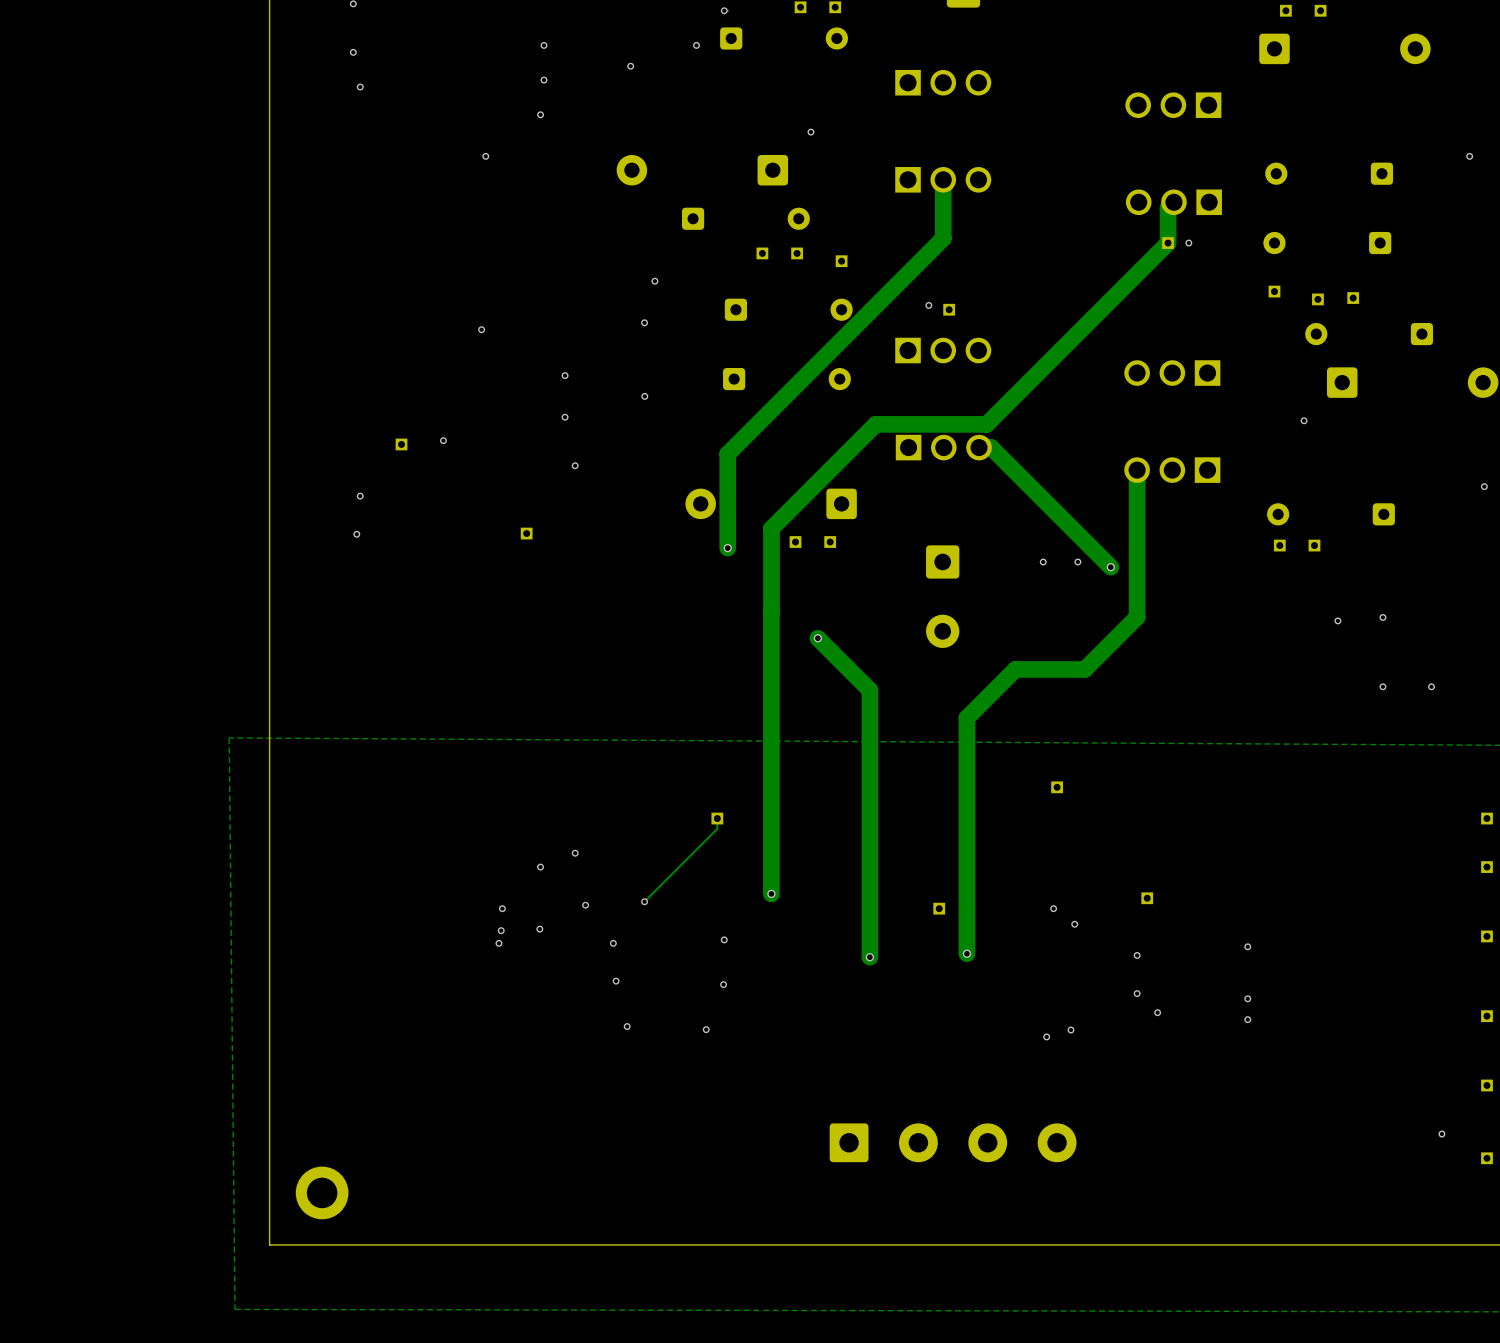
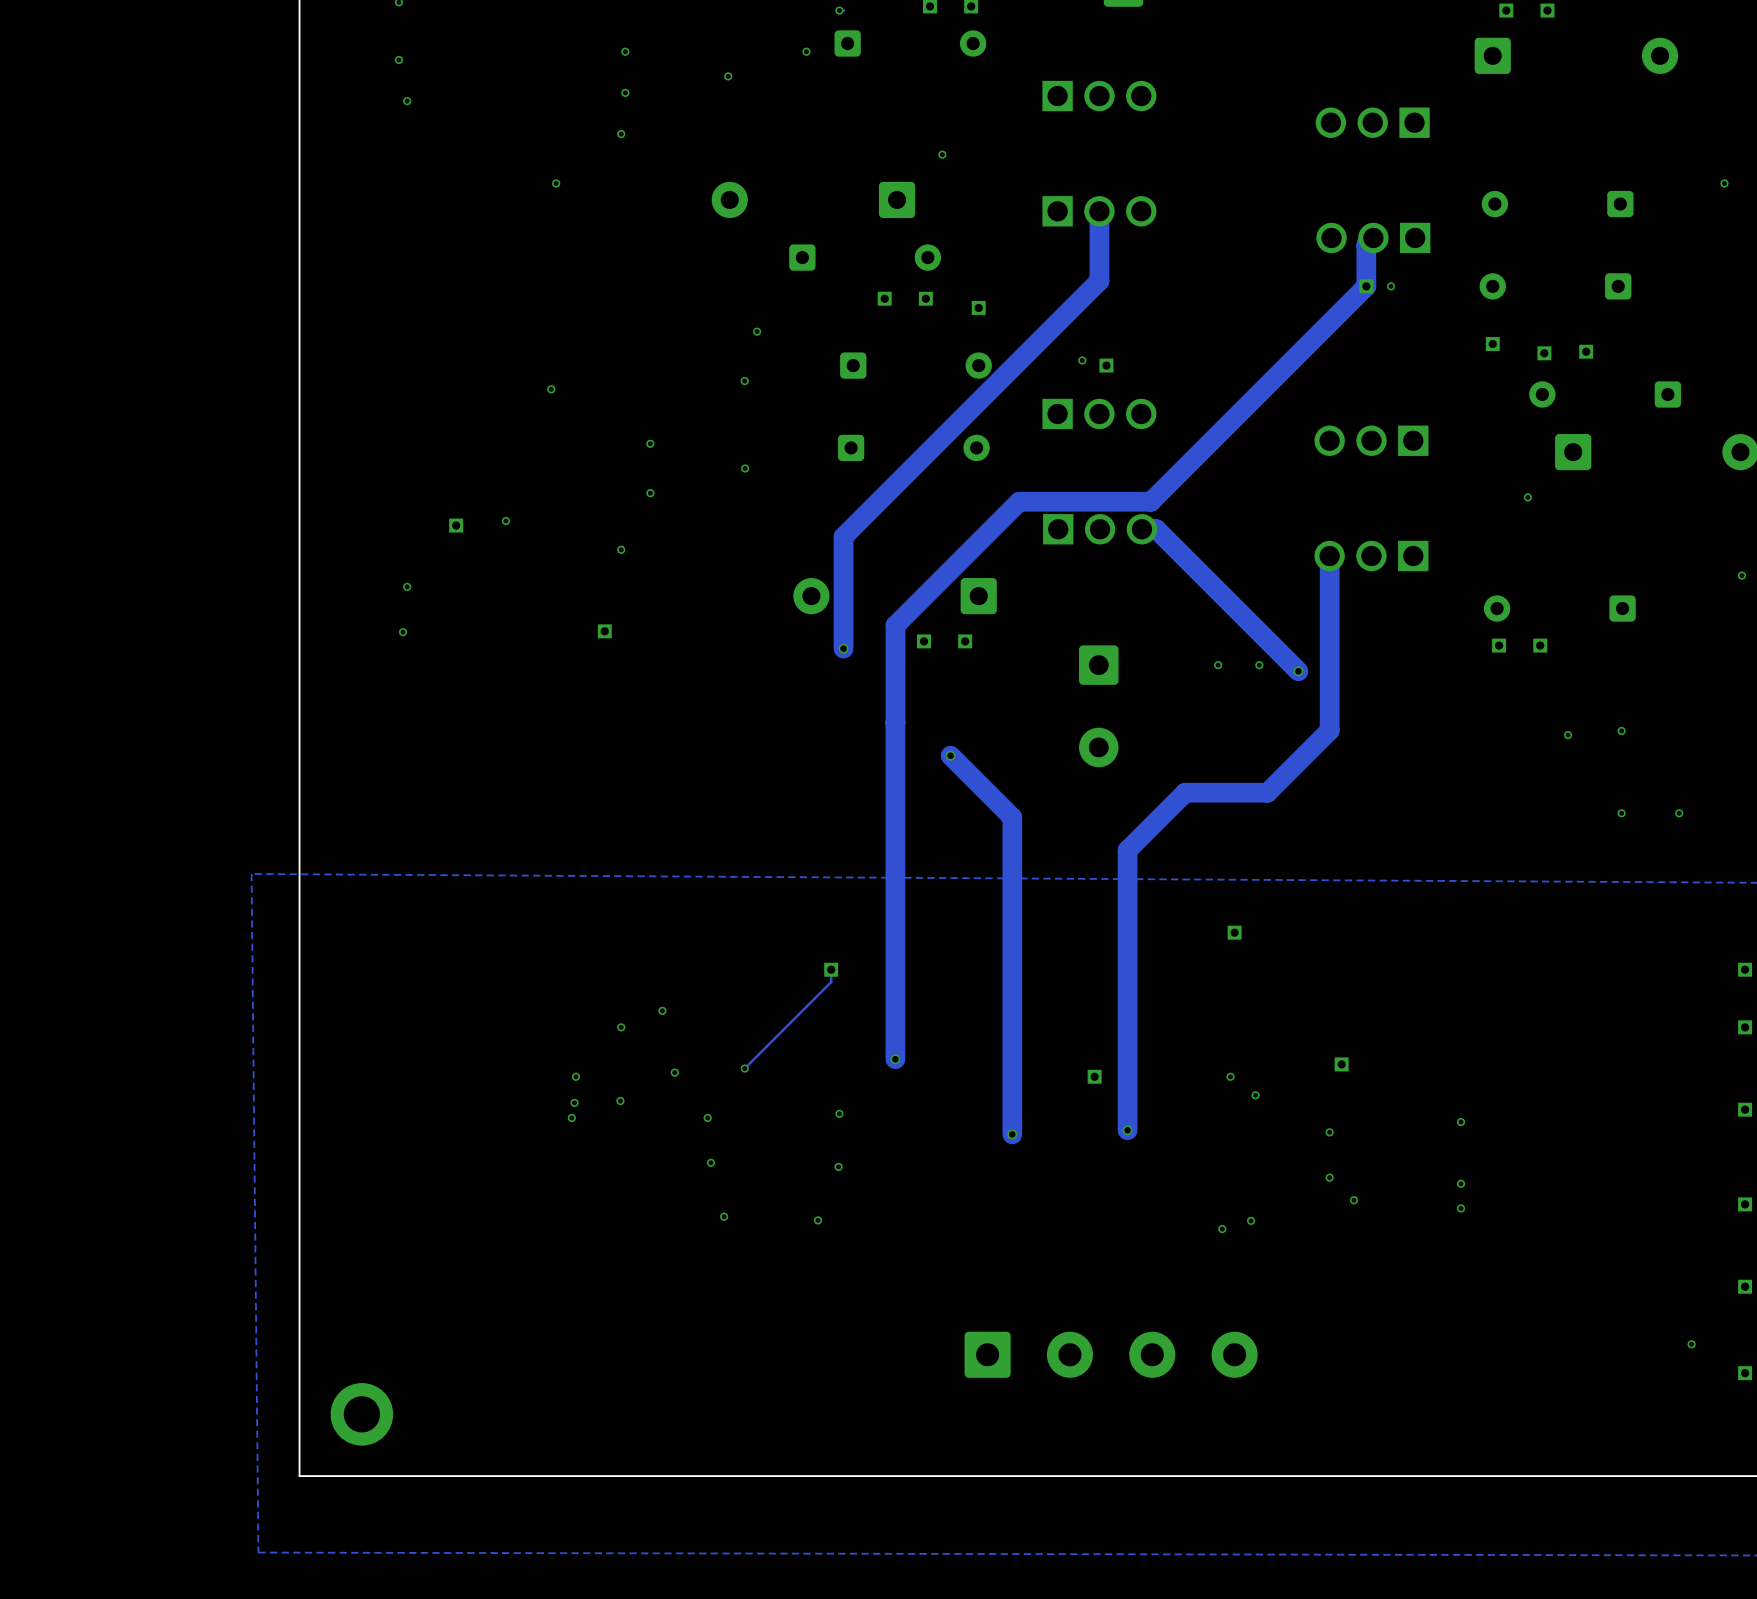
via position: (575, 465) -> (621, 549)

